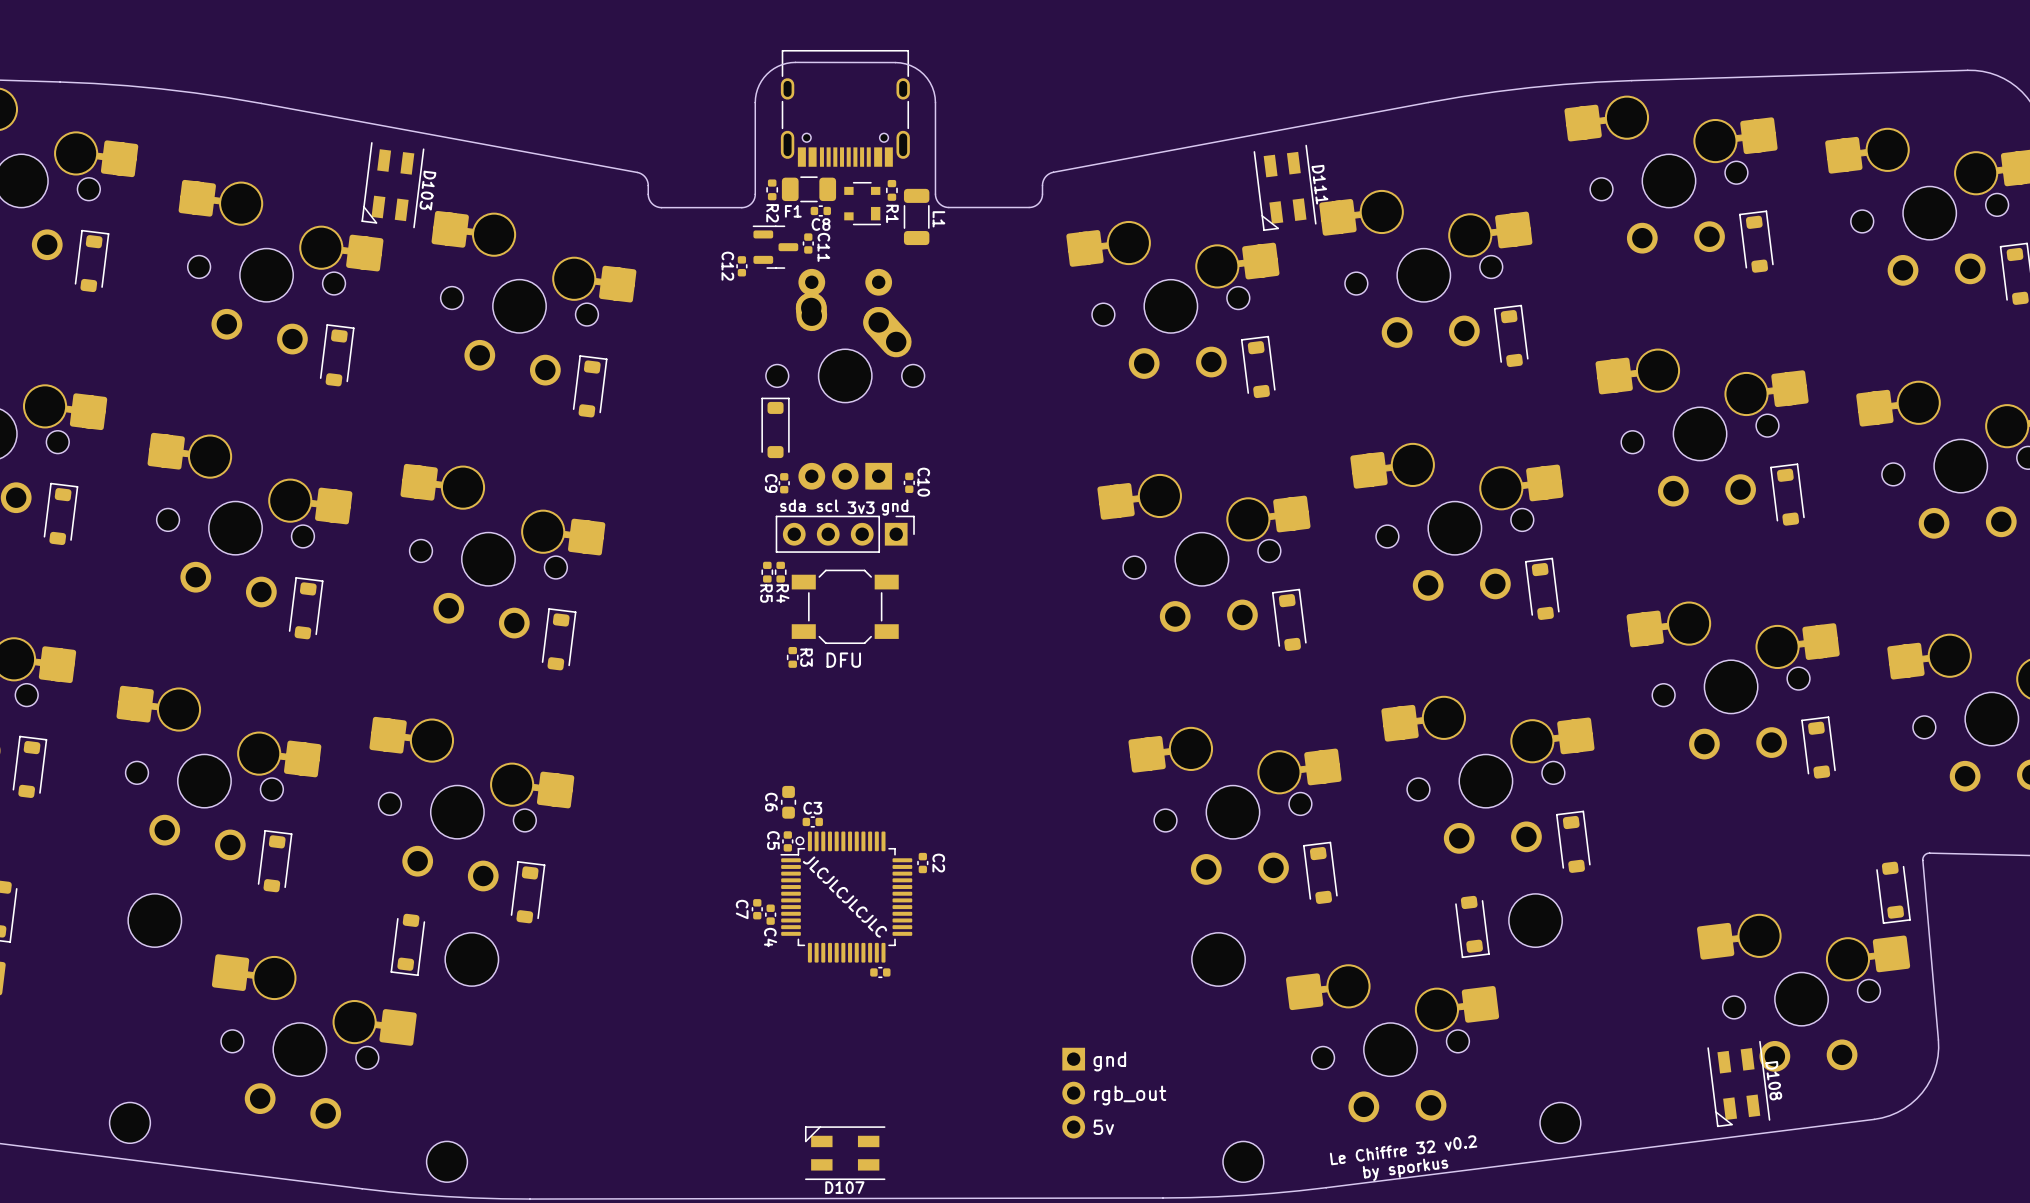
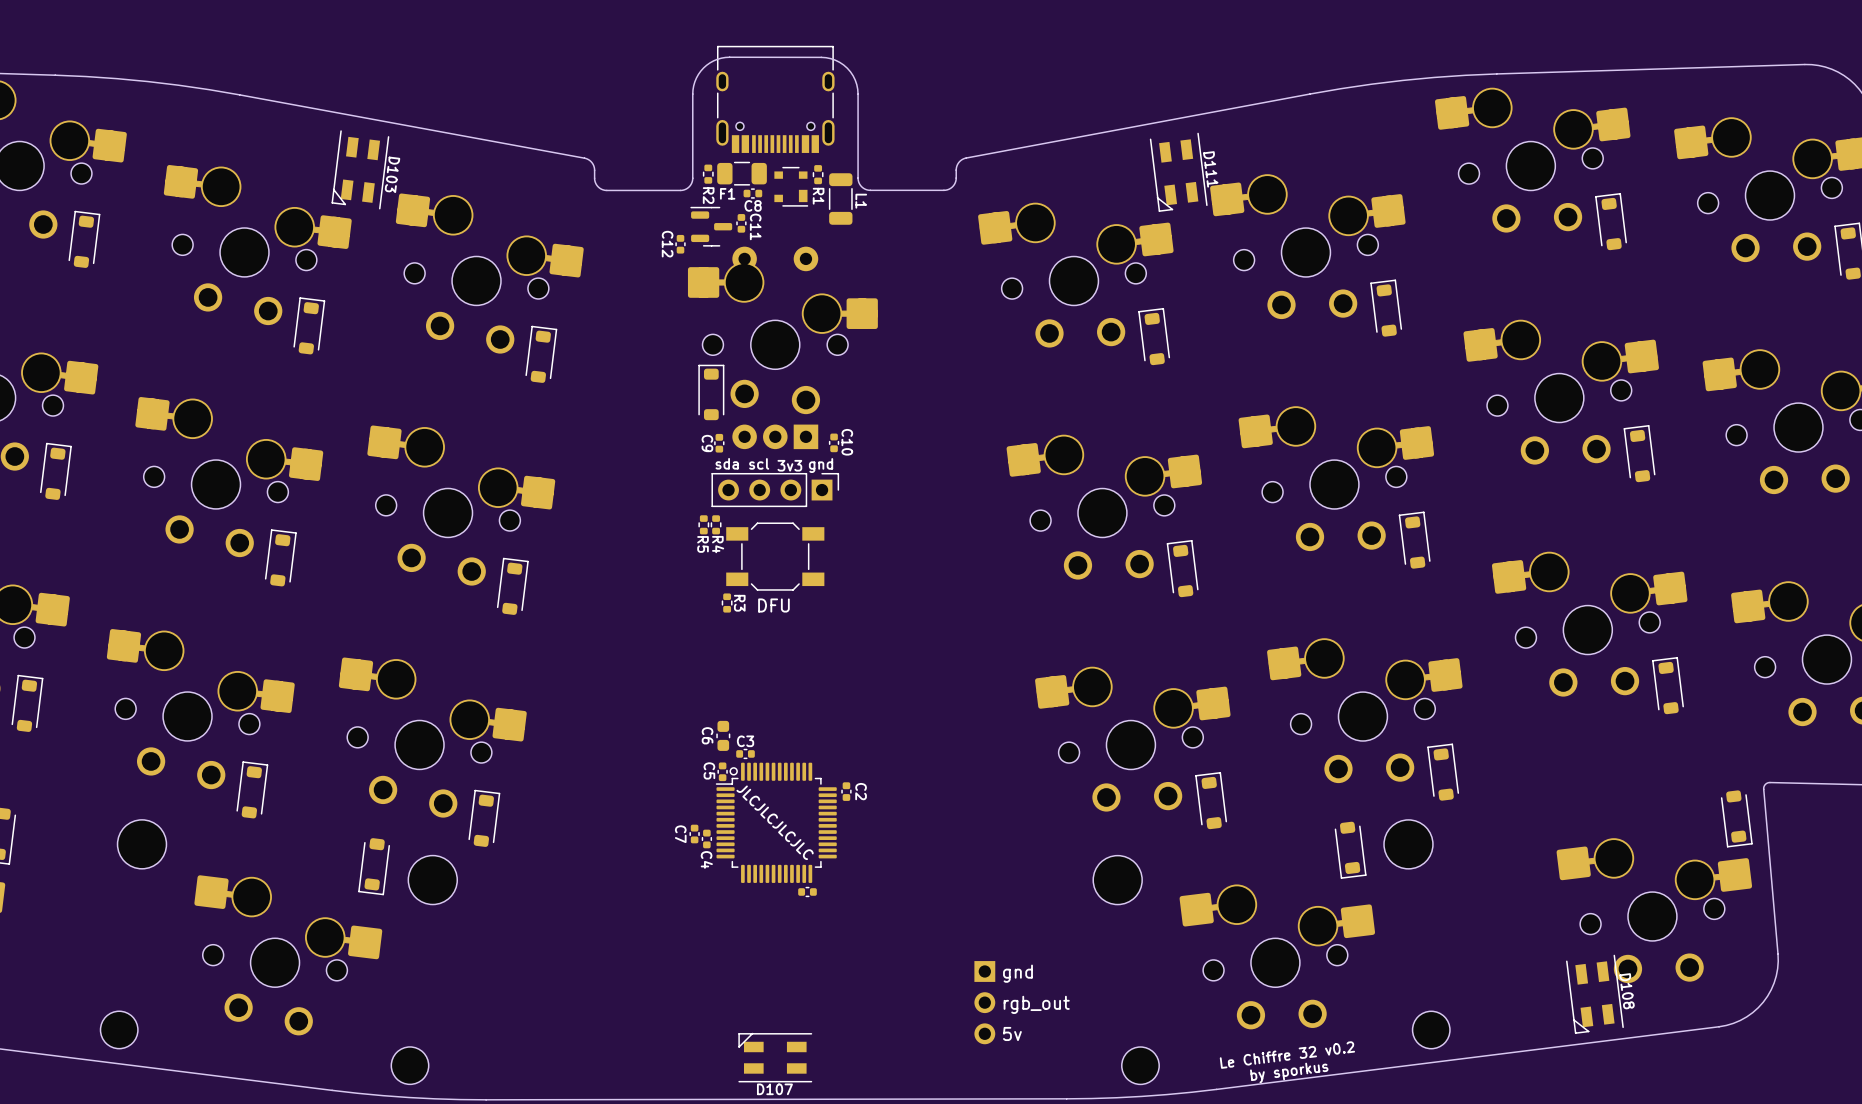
part: (845, 347) -> none
part: none -> (782, 338)

